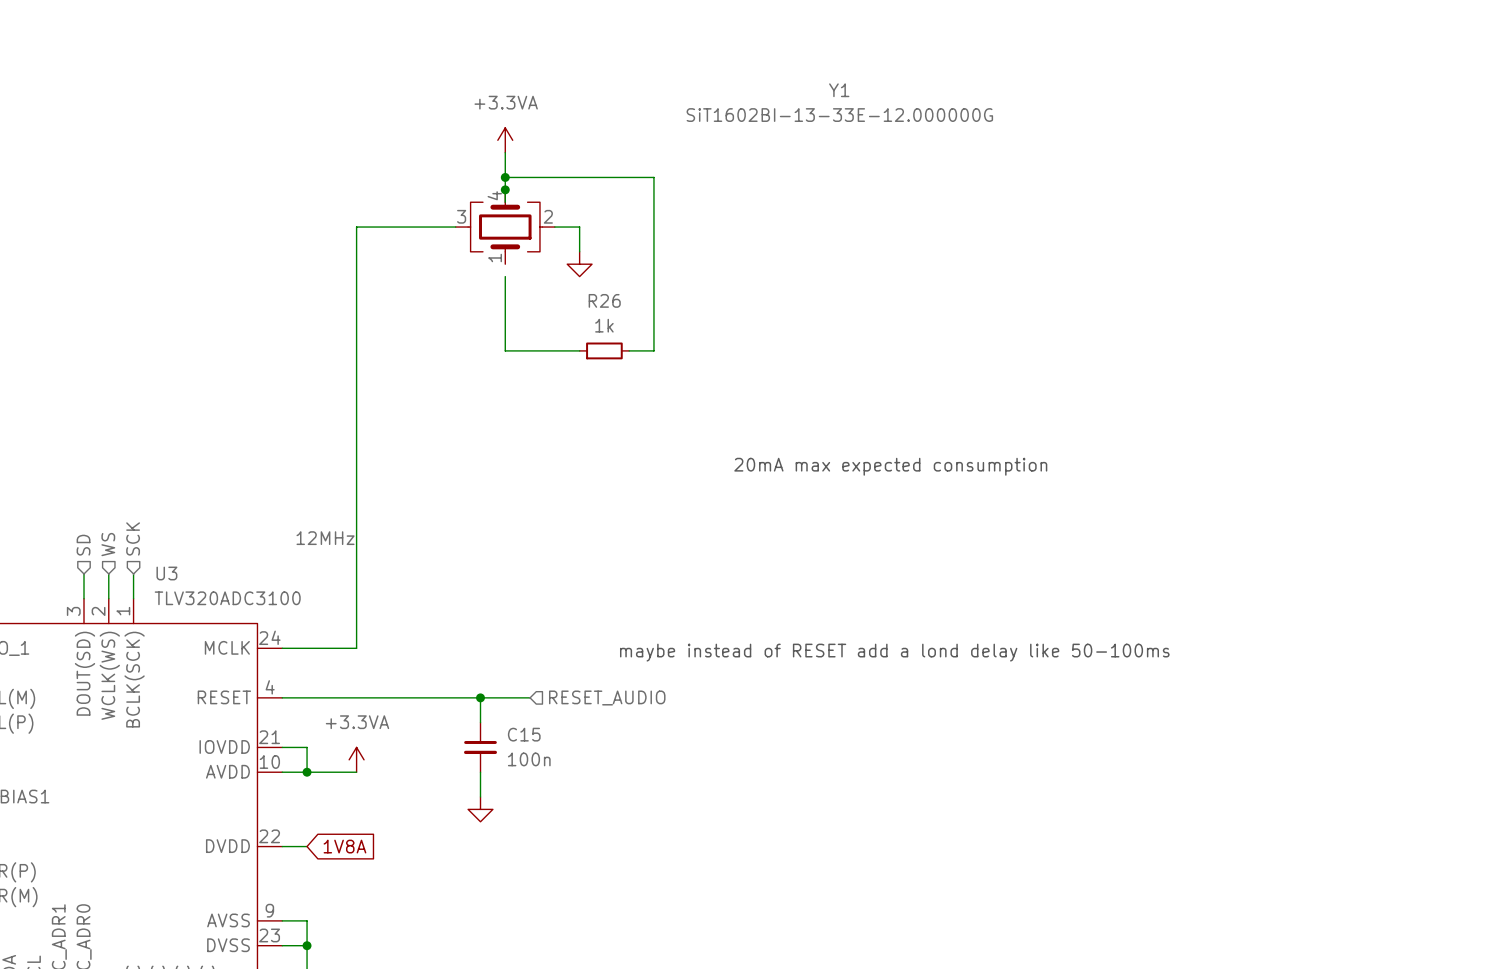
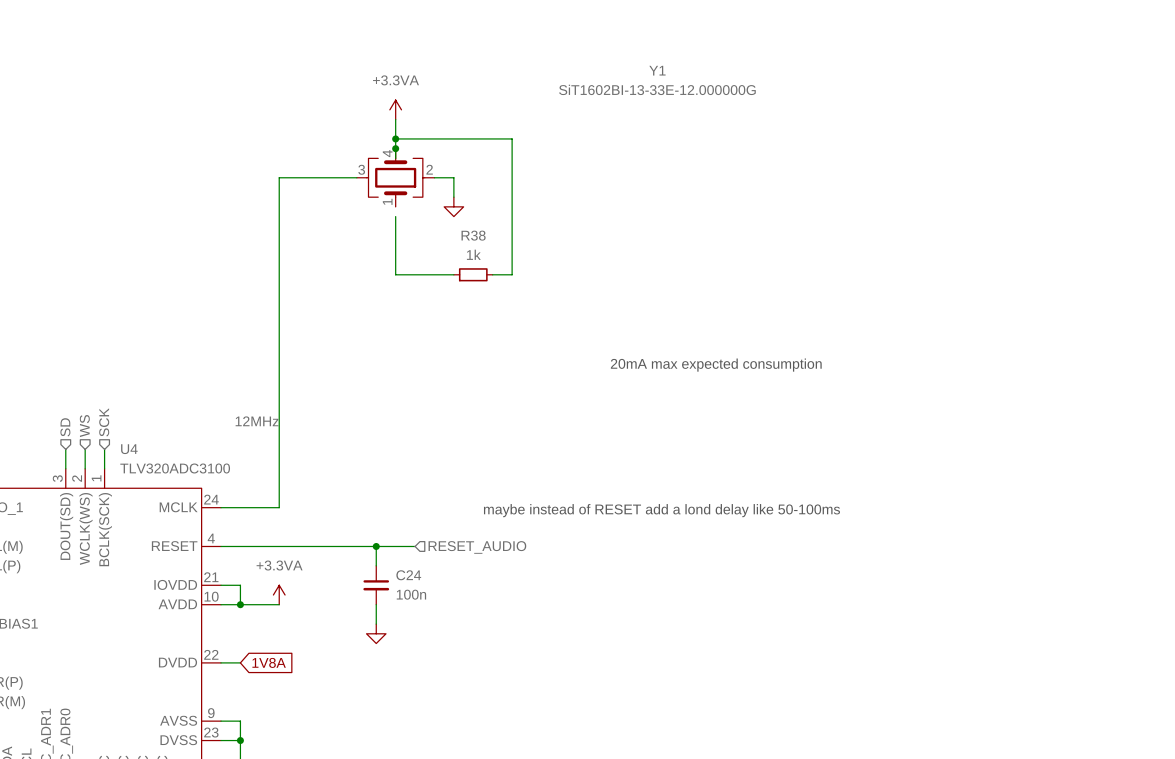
R26 name: R26 (604, 300) -> R38 (473, 235)
U3 name: U3 (166, 573) -> U4 (129, 449)
C15 name: C15 (524, 734) -> C24 (408, 575)

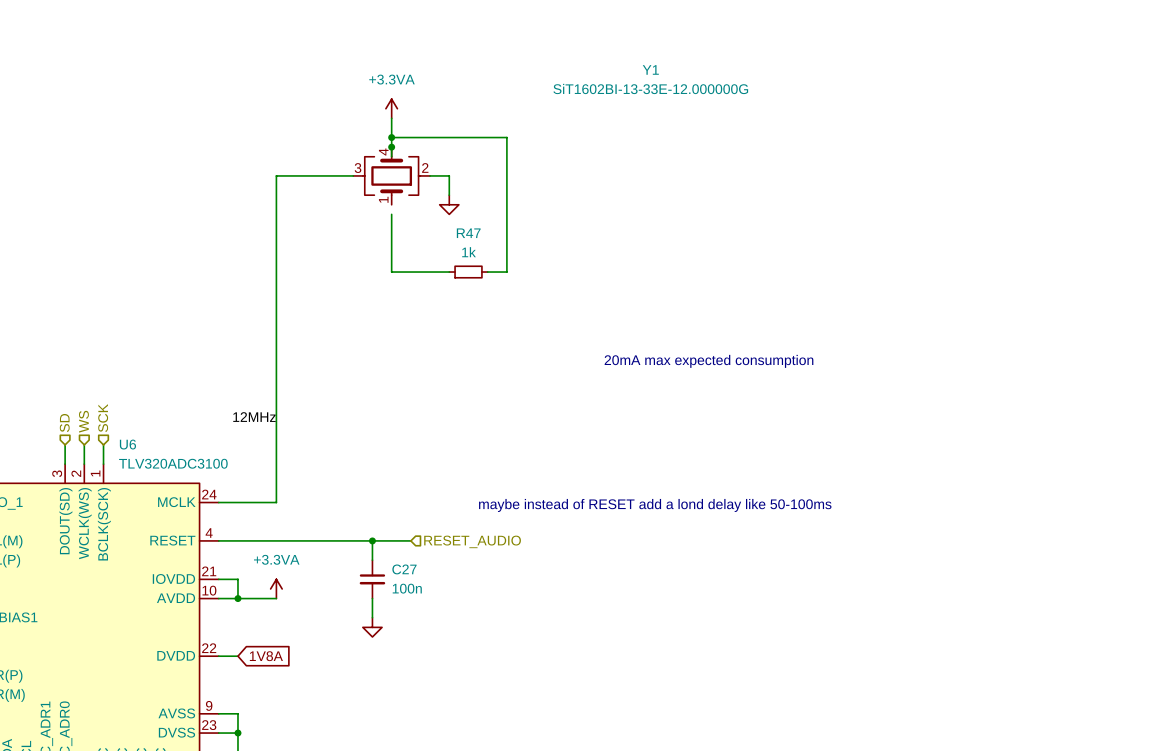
R38 name: R38 (473, 235) -> R47 (468, 233)
U4 name: U4 (129, 449) -> U6 (127, 444)
C24 name: C24 (408, 575) -> C27 (404, 569)

